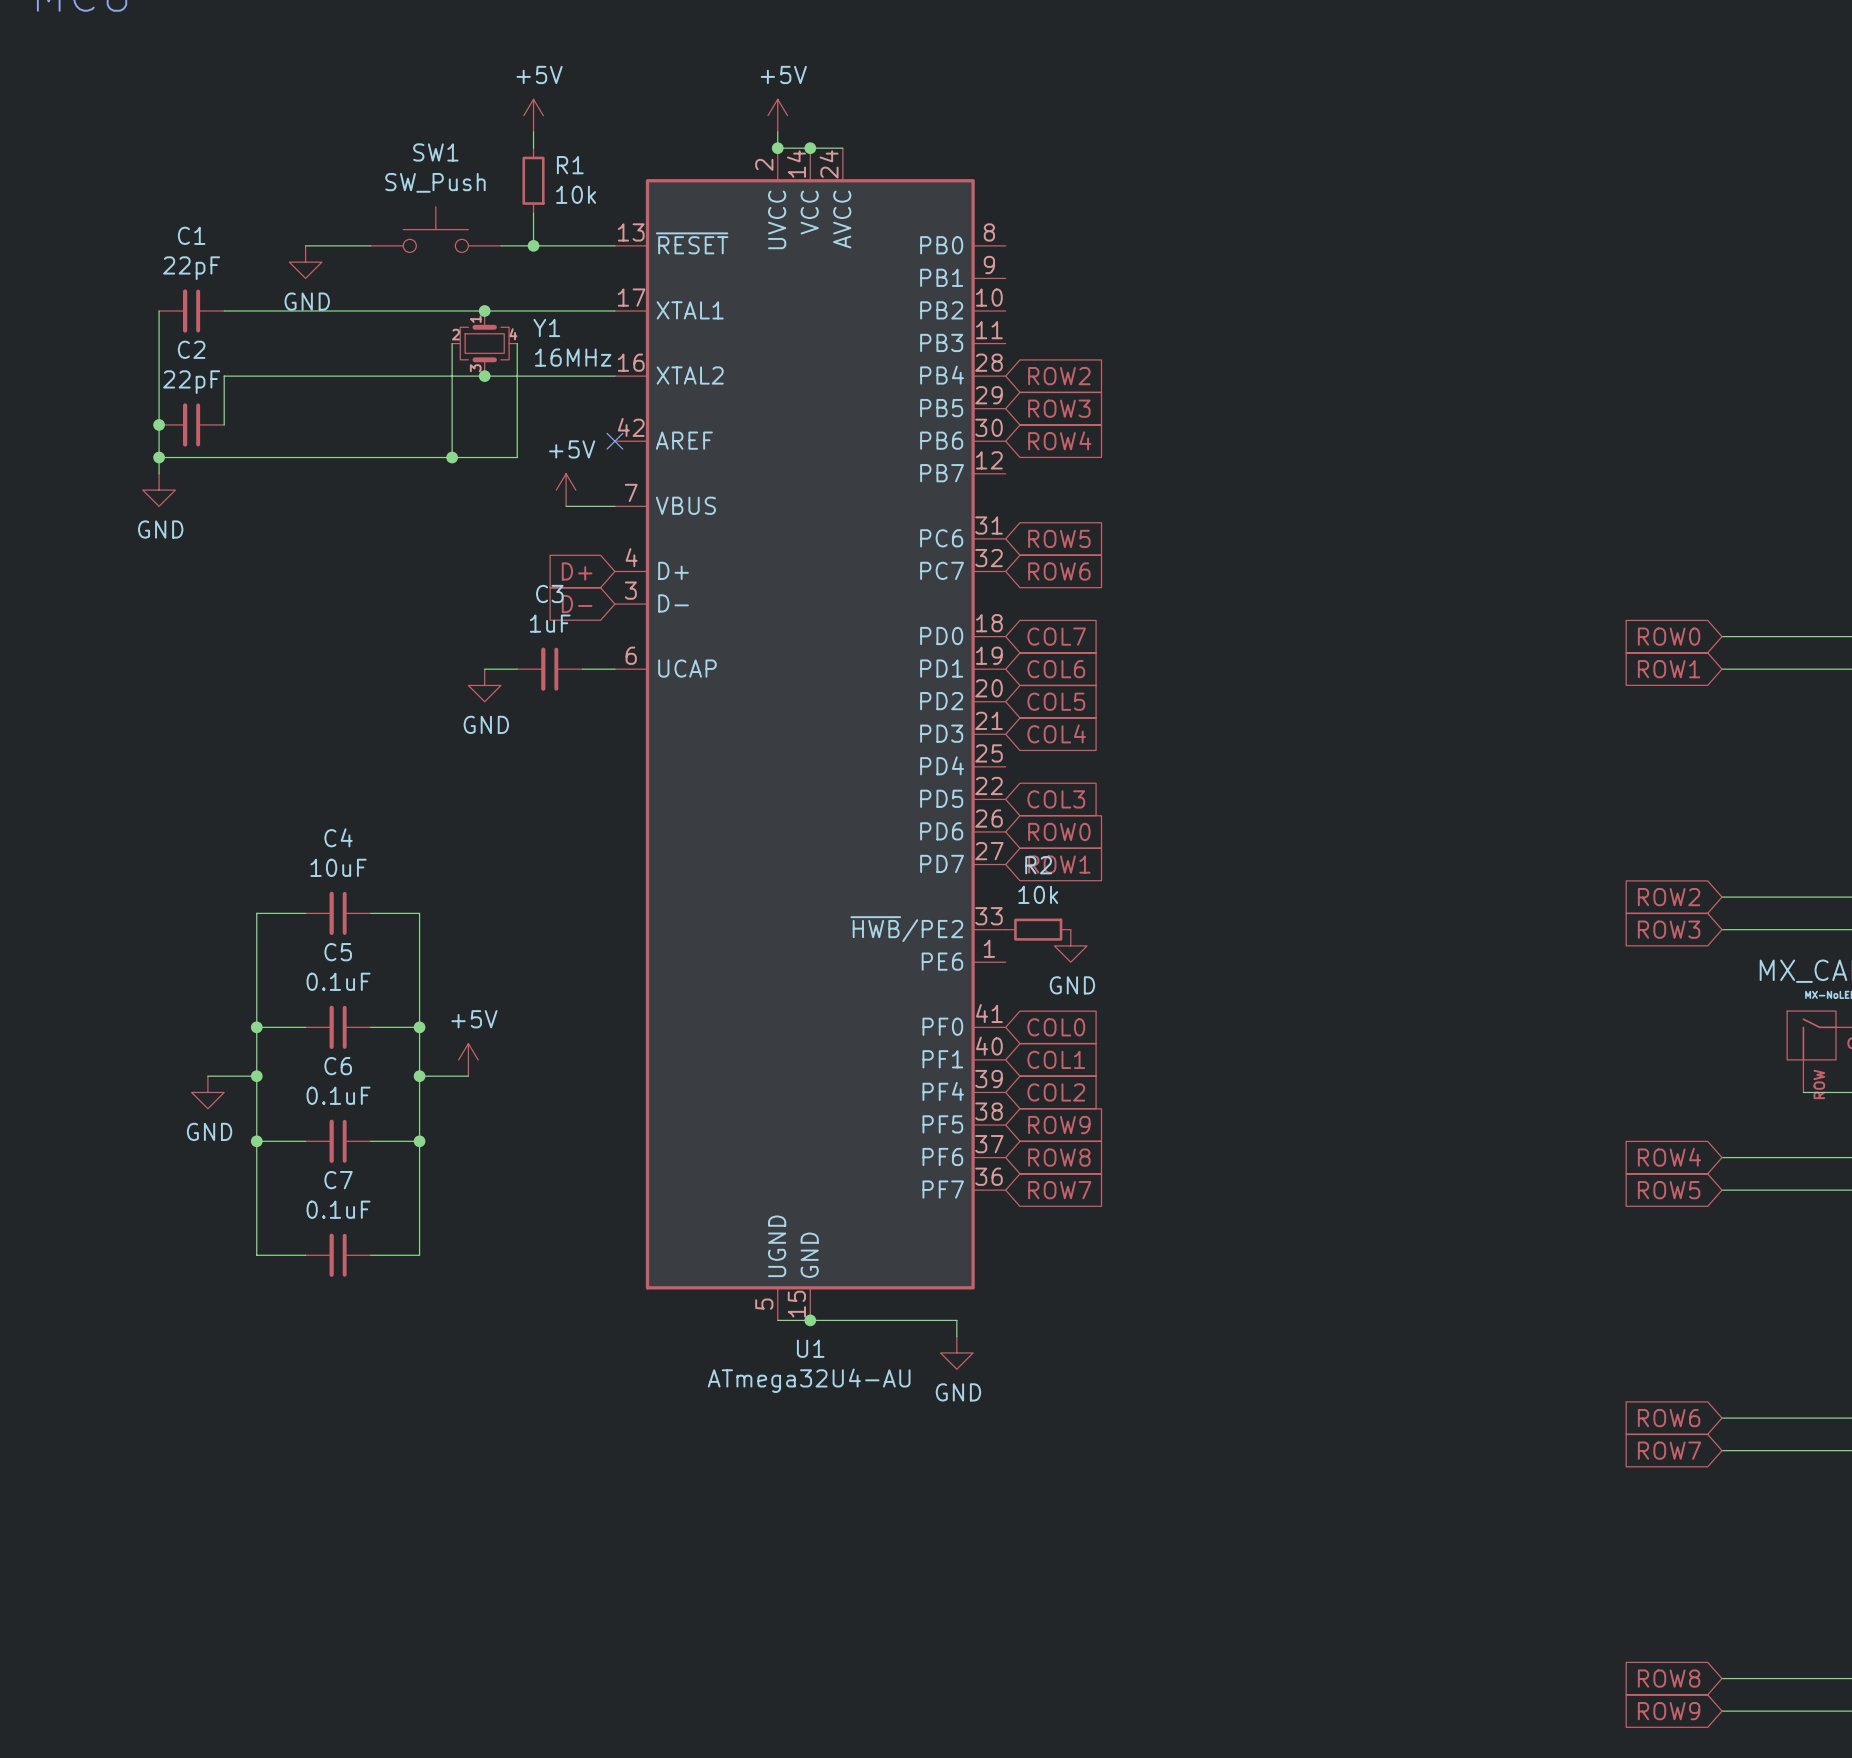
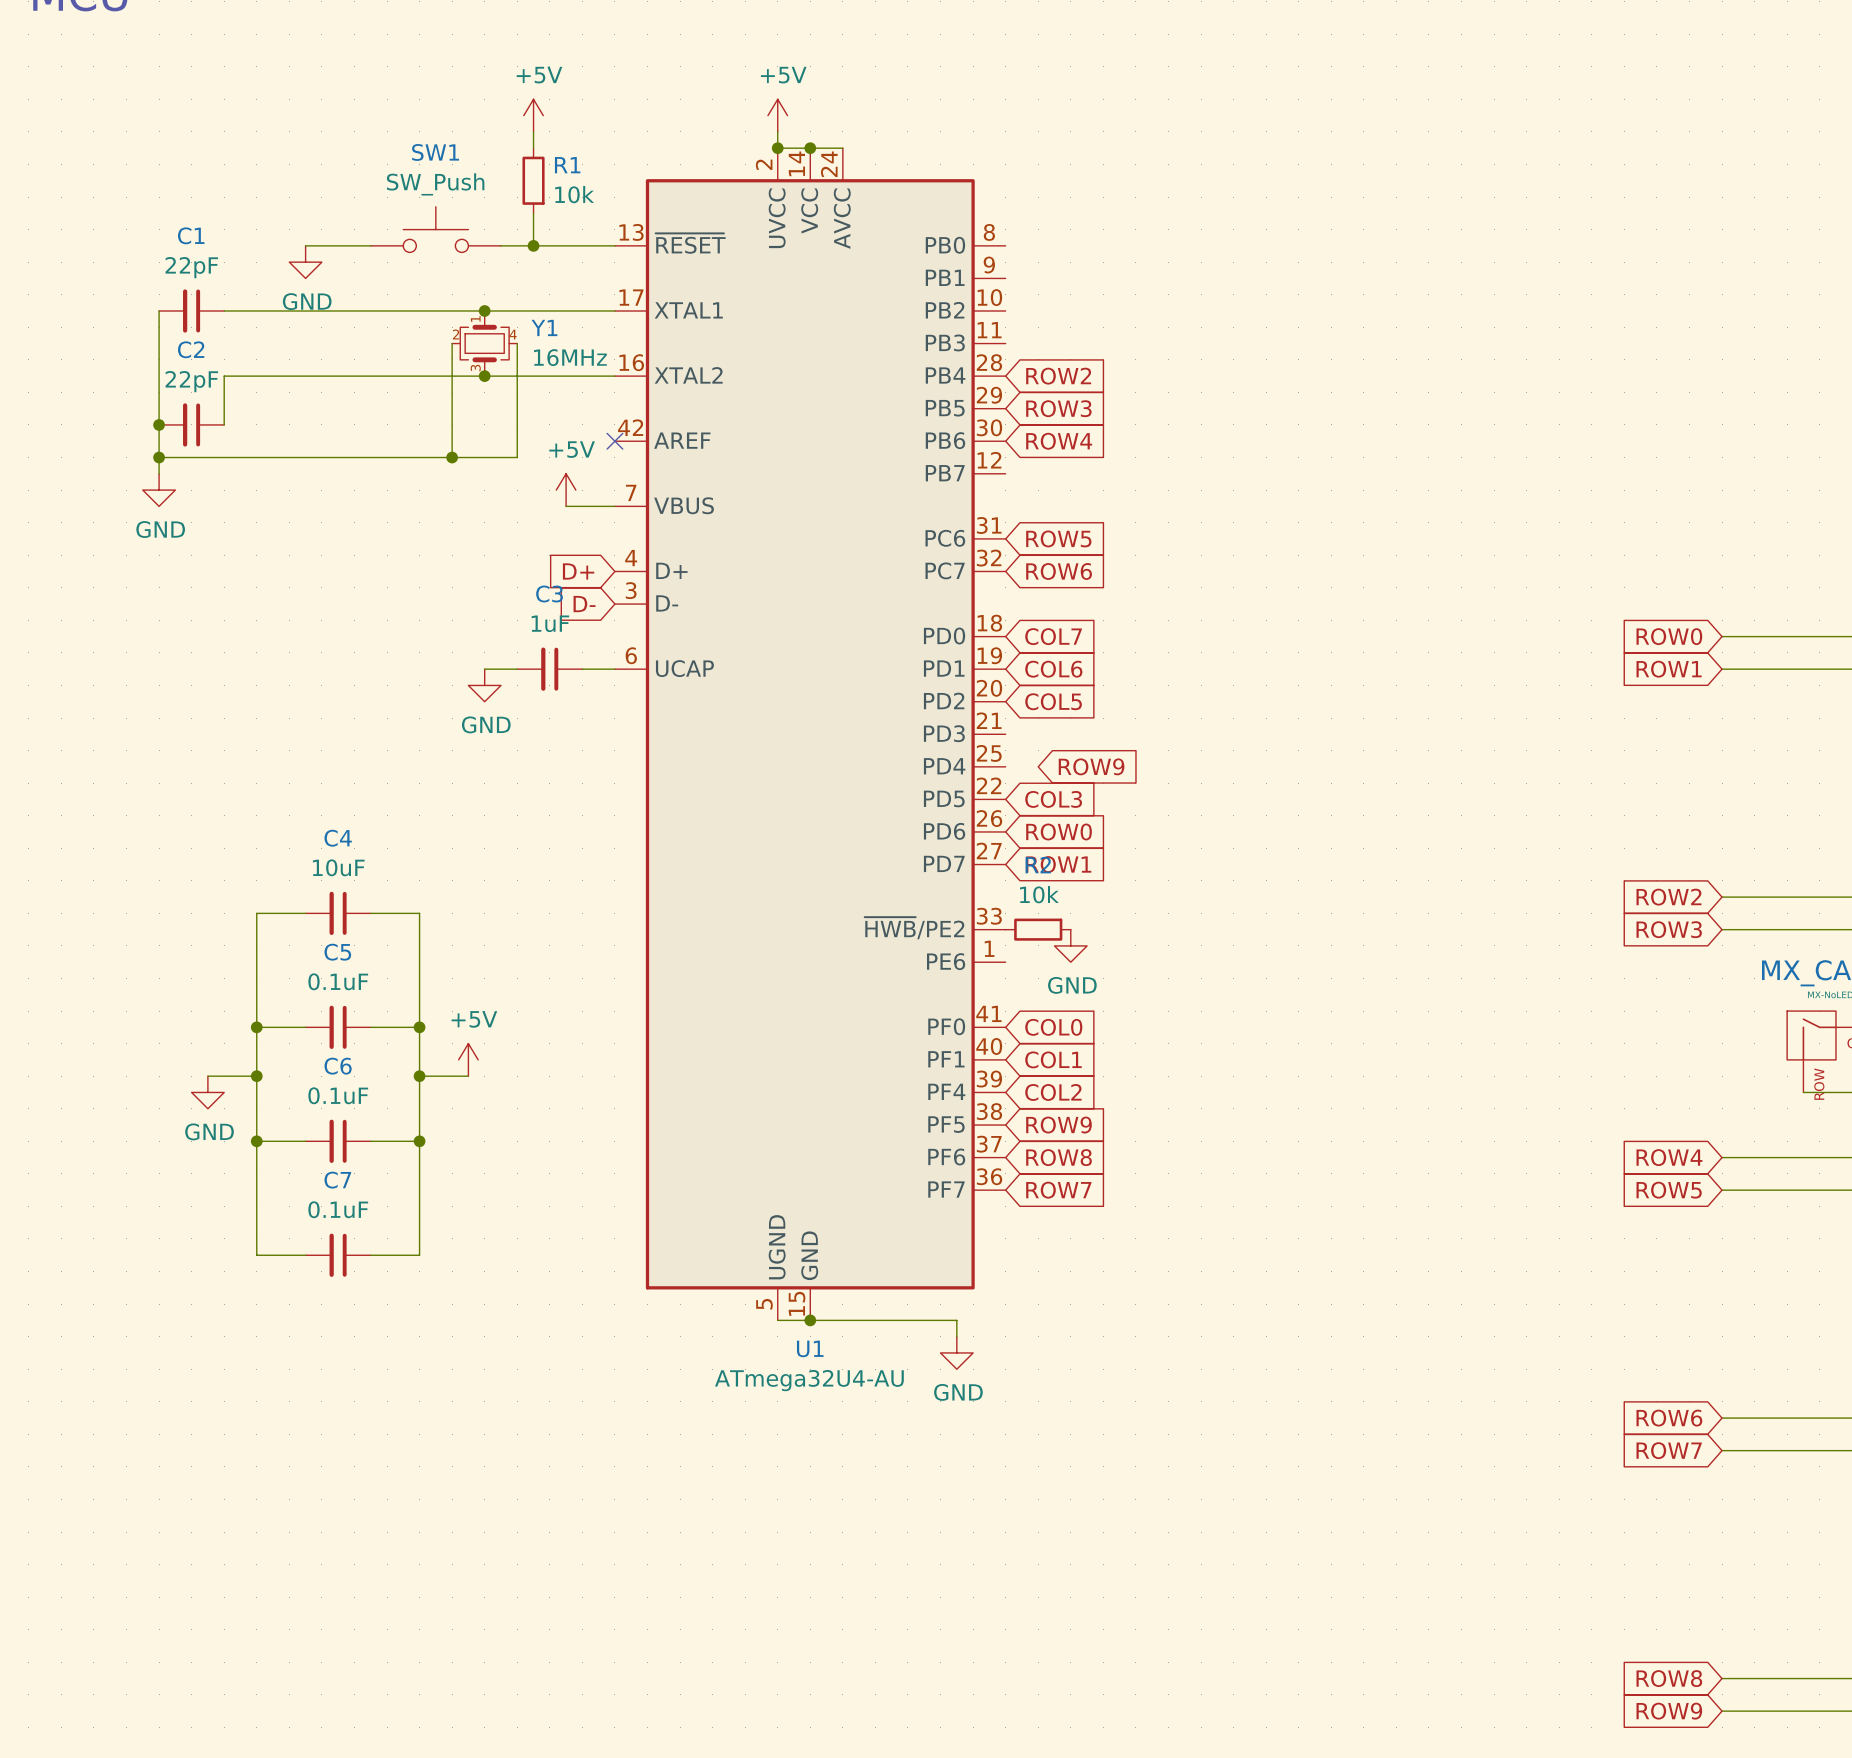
global label: COL4 (1056, 733) -> none
global label: none -> ROW9 (1091, 766)

